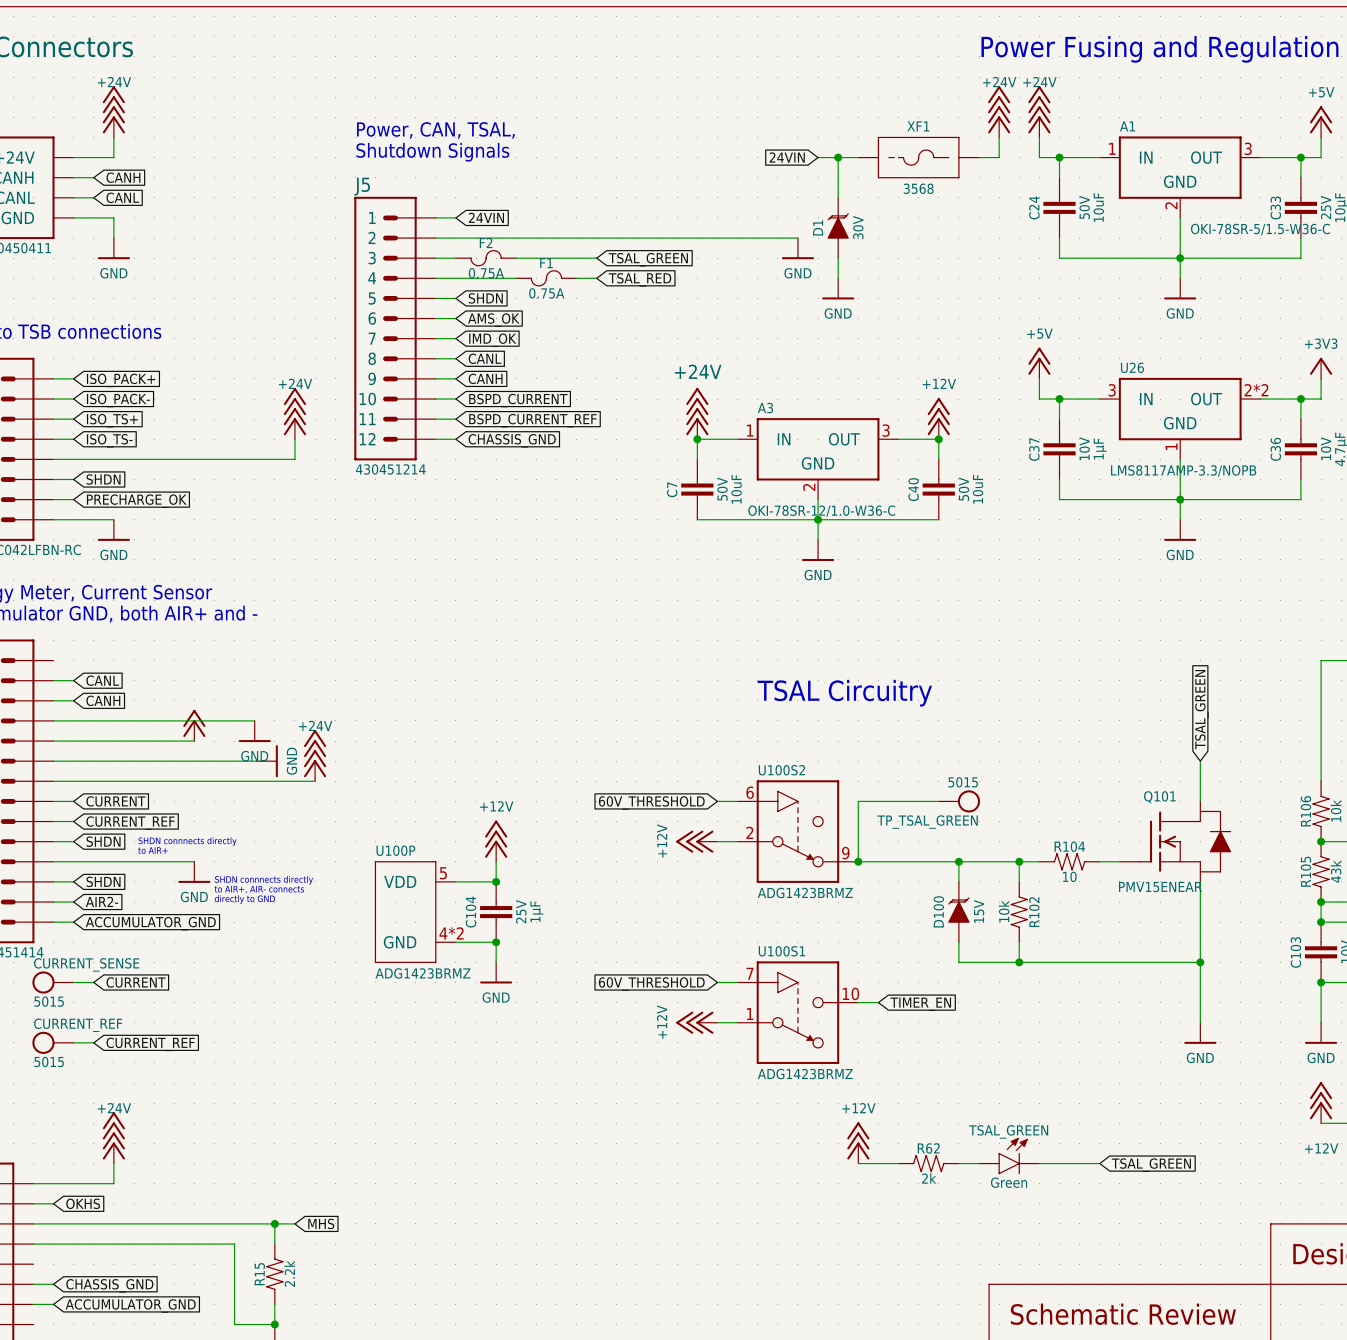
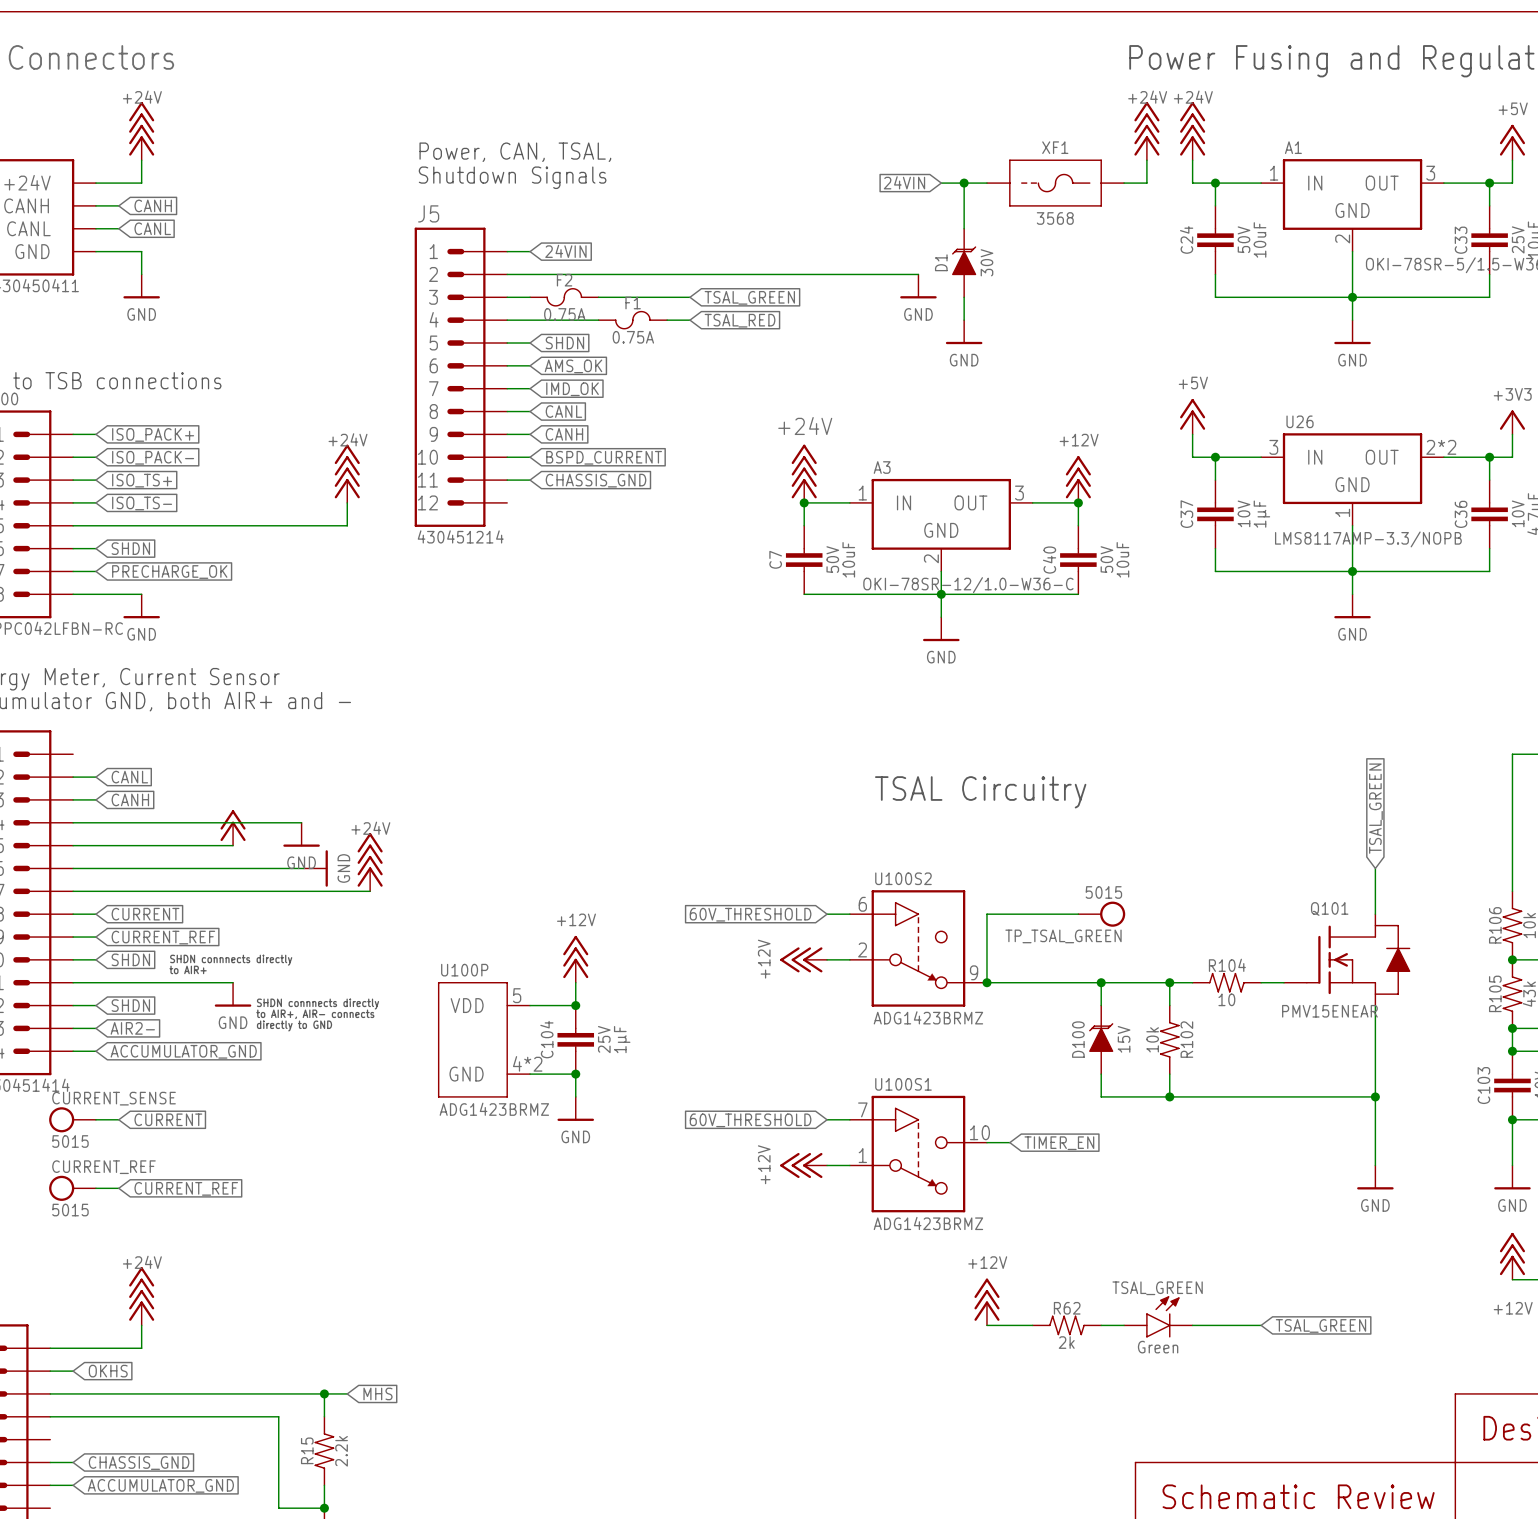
global label: BSPD_CURRENT_REF (532, 420) -> CHASSIS_GND (596, 480)
wire: (435, 439) (455, 439) -> none
global label: CHASSIS_GND (512, 440) -> none

